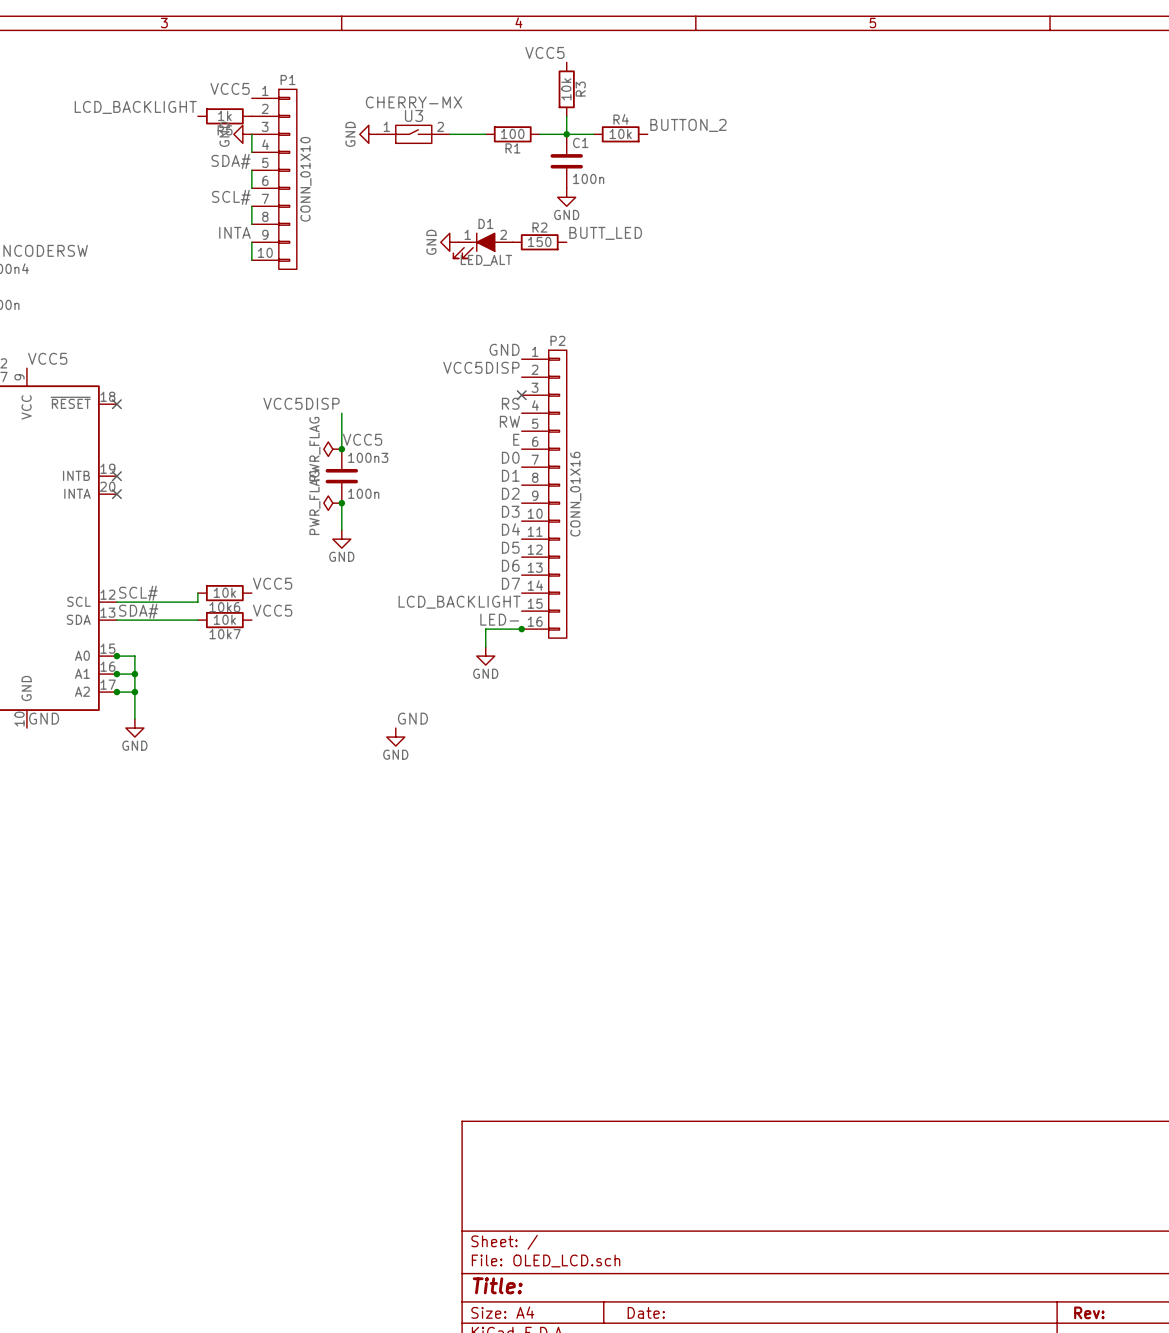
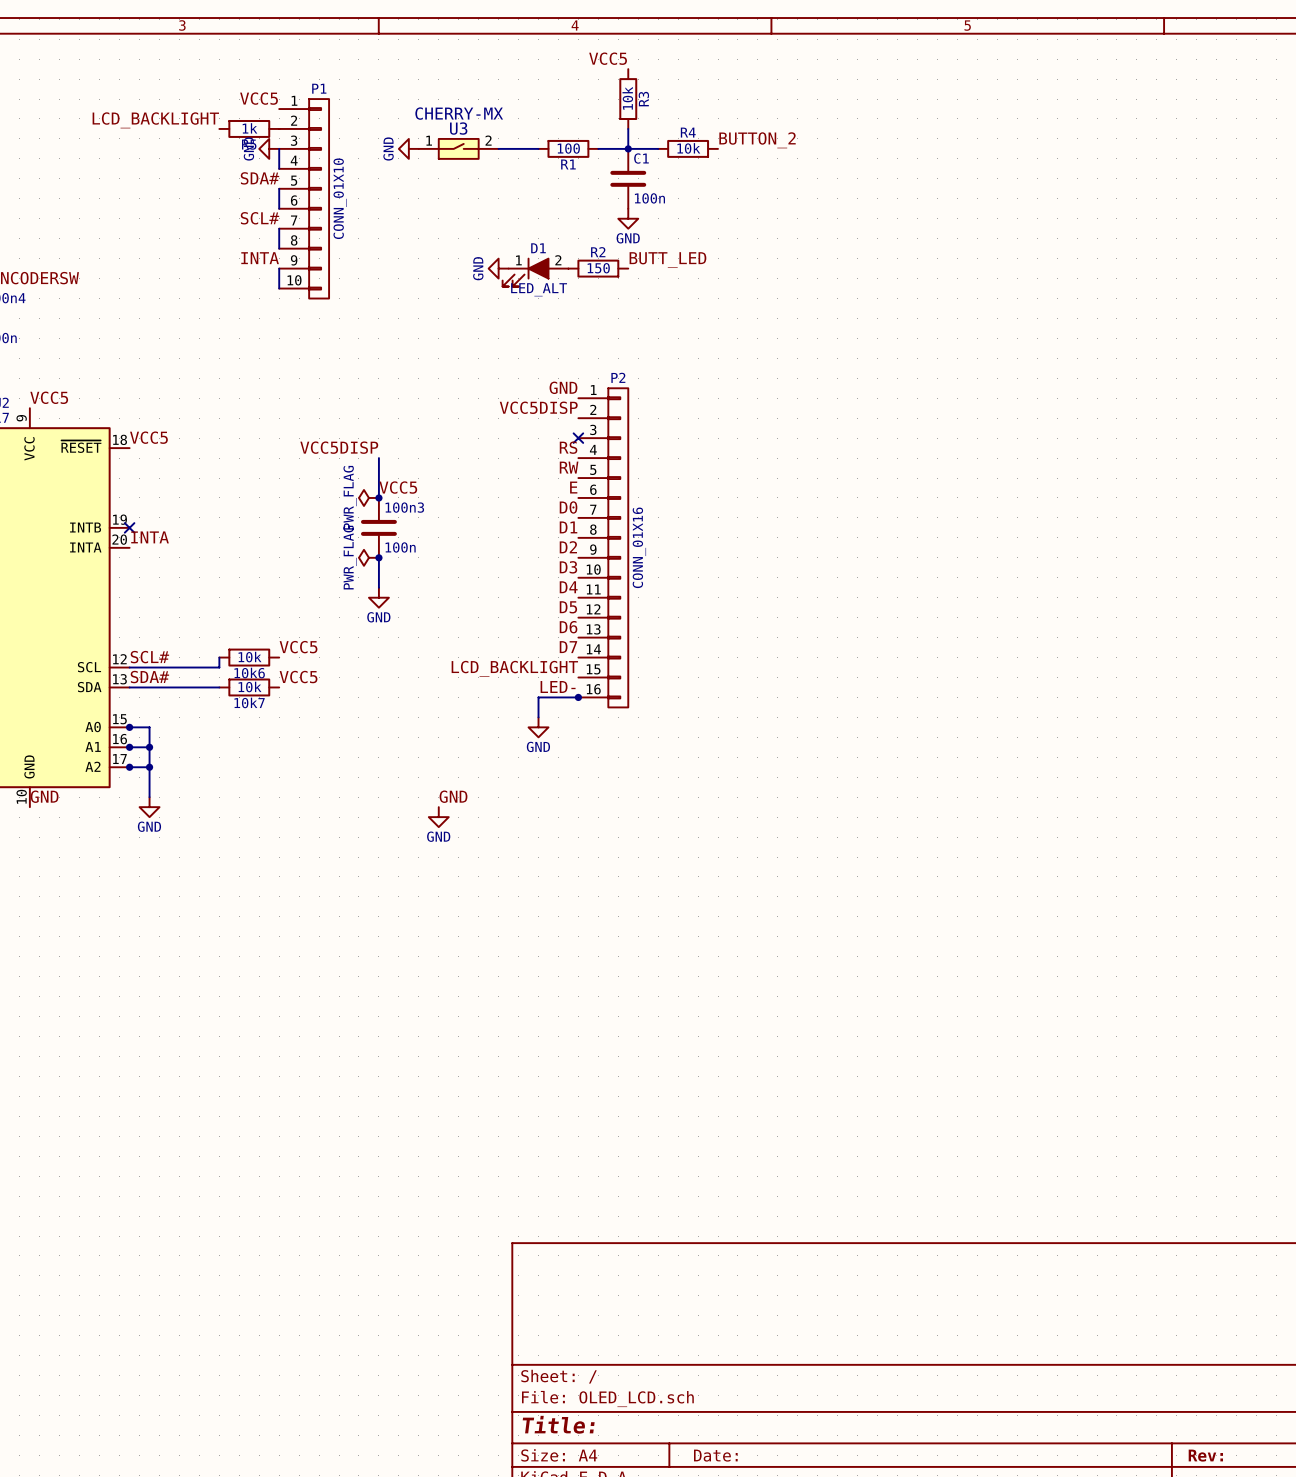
label: none -> VCC5 (148, 437)
no-connect mark: (116, 404) -> none
label: none -> INTA (150, 537)
no-connect mark: (116, 494) -> none

